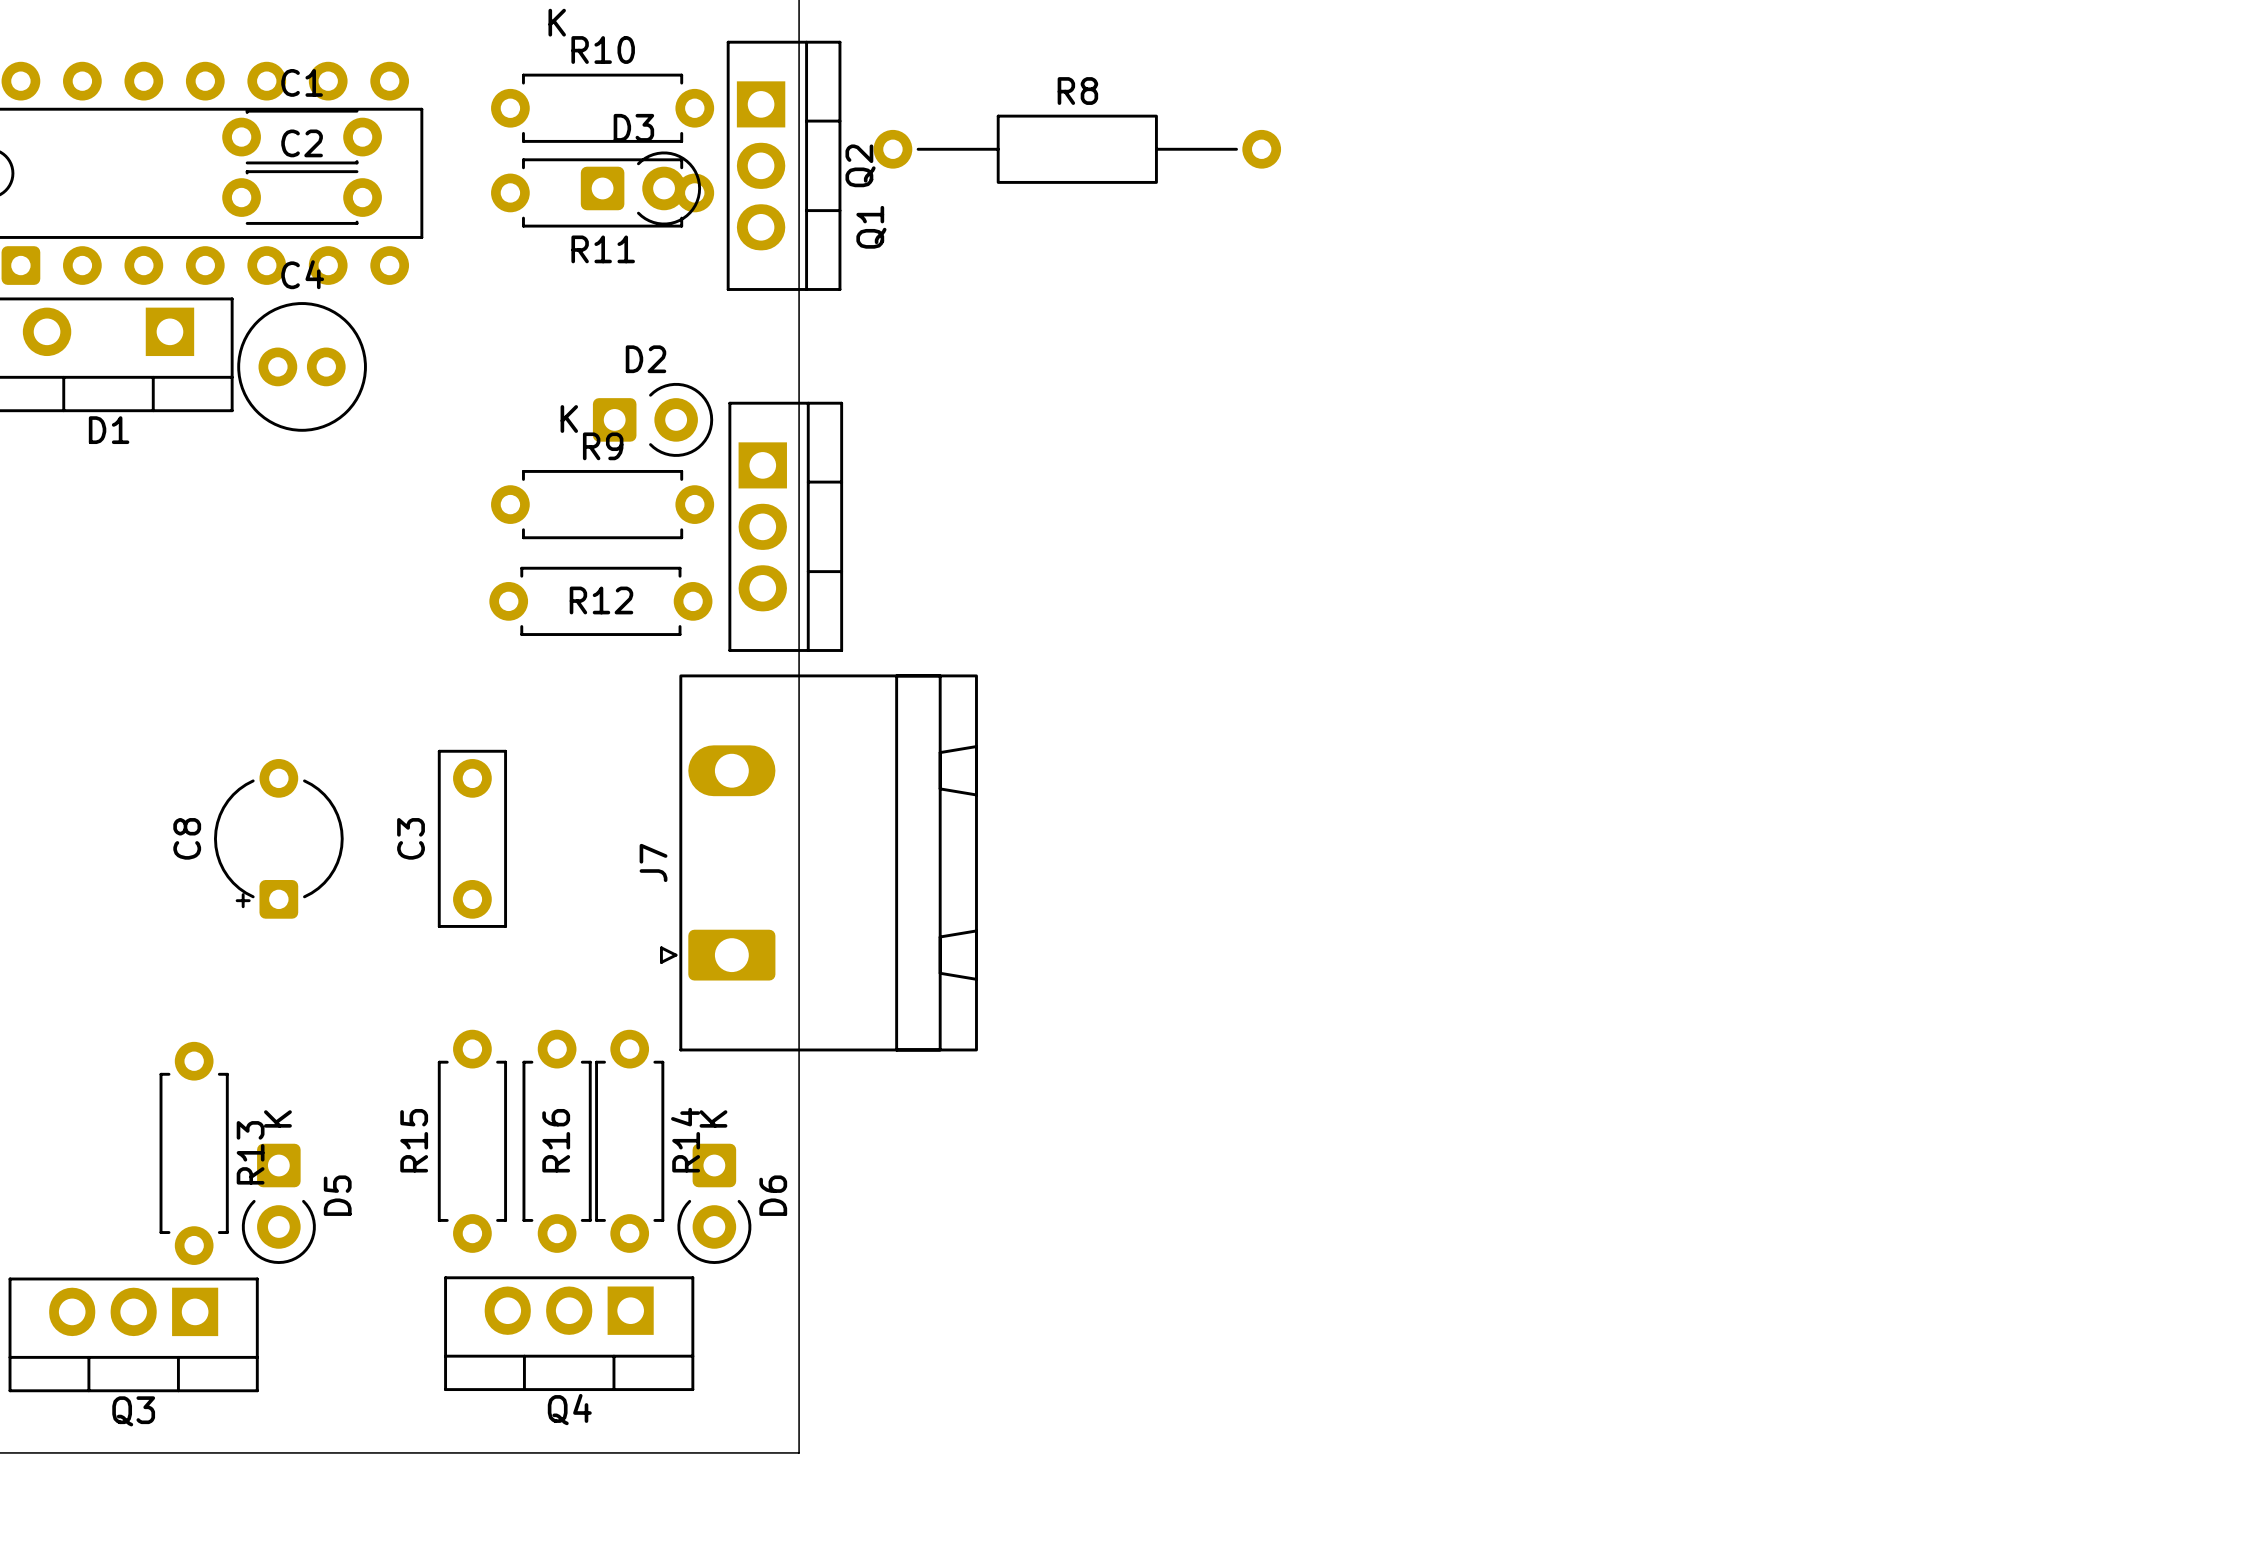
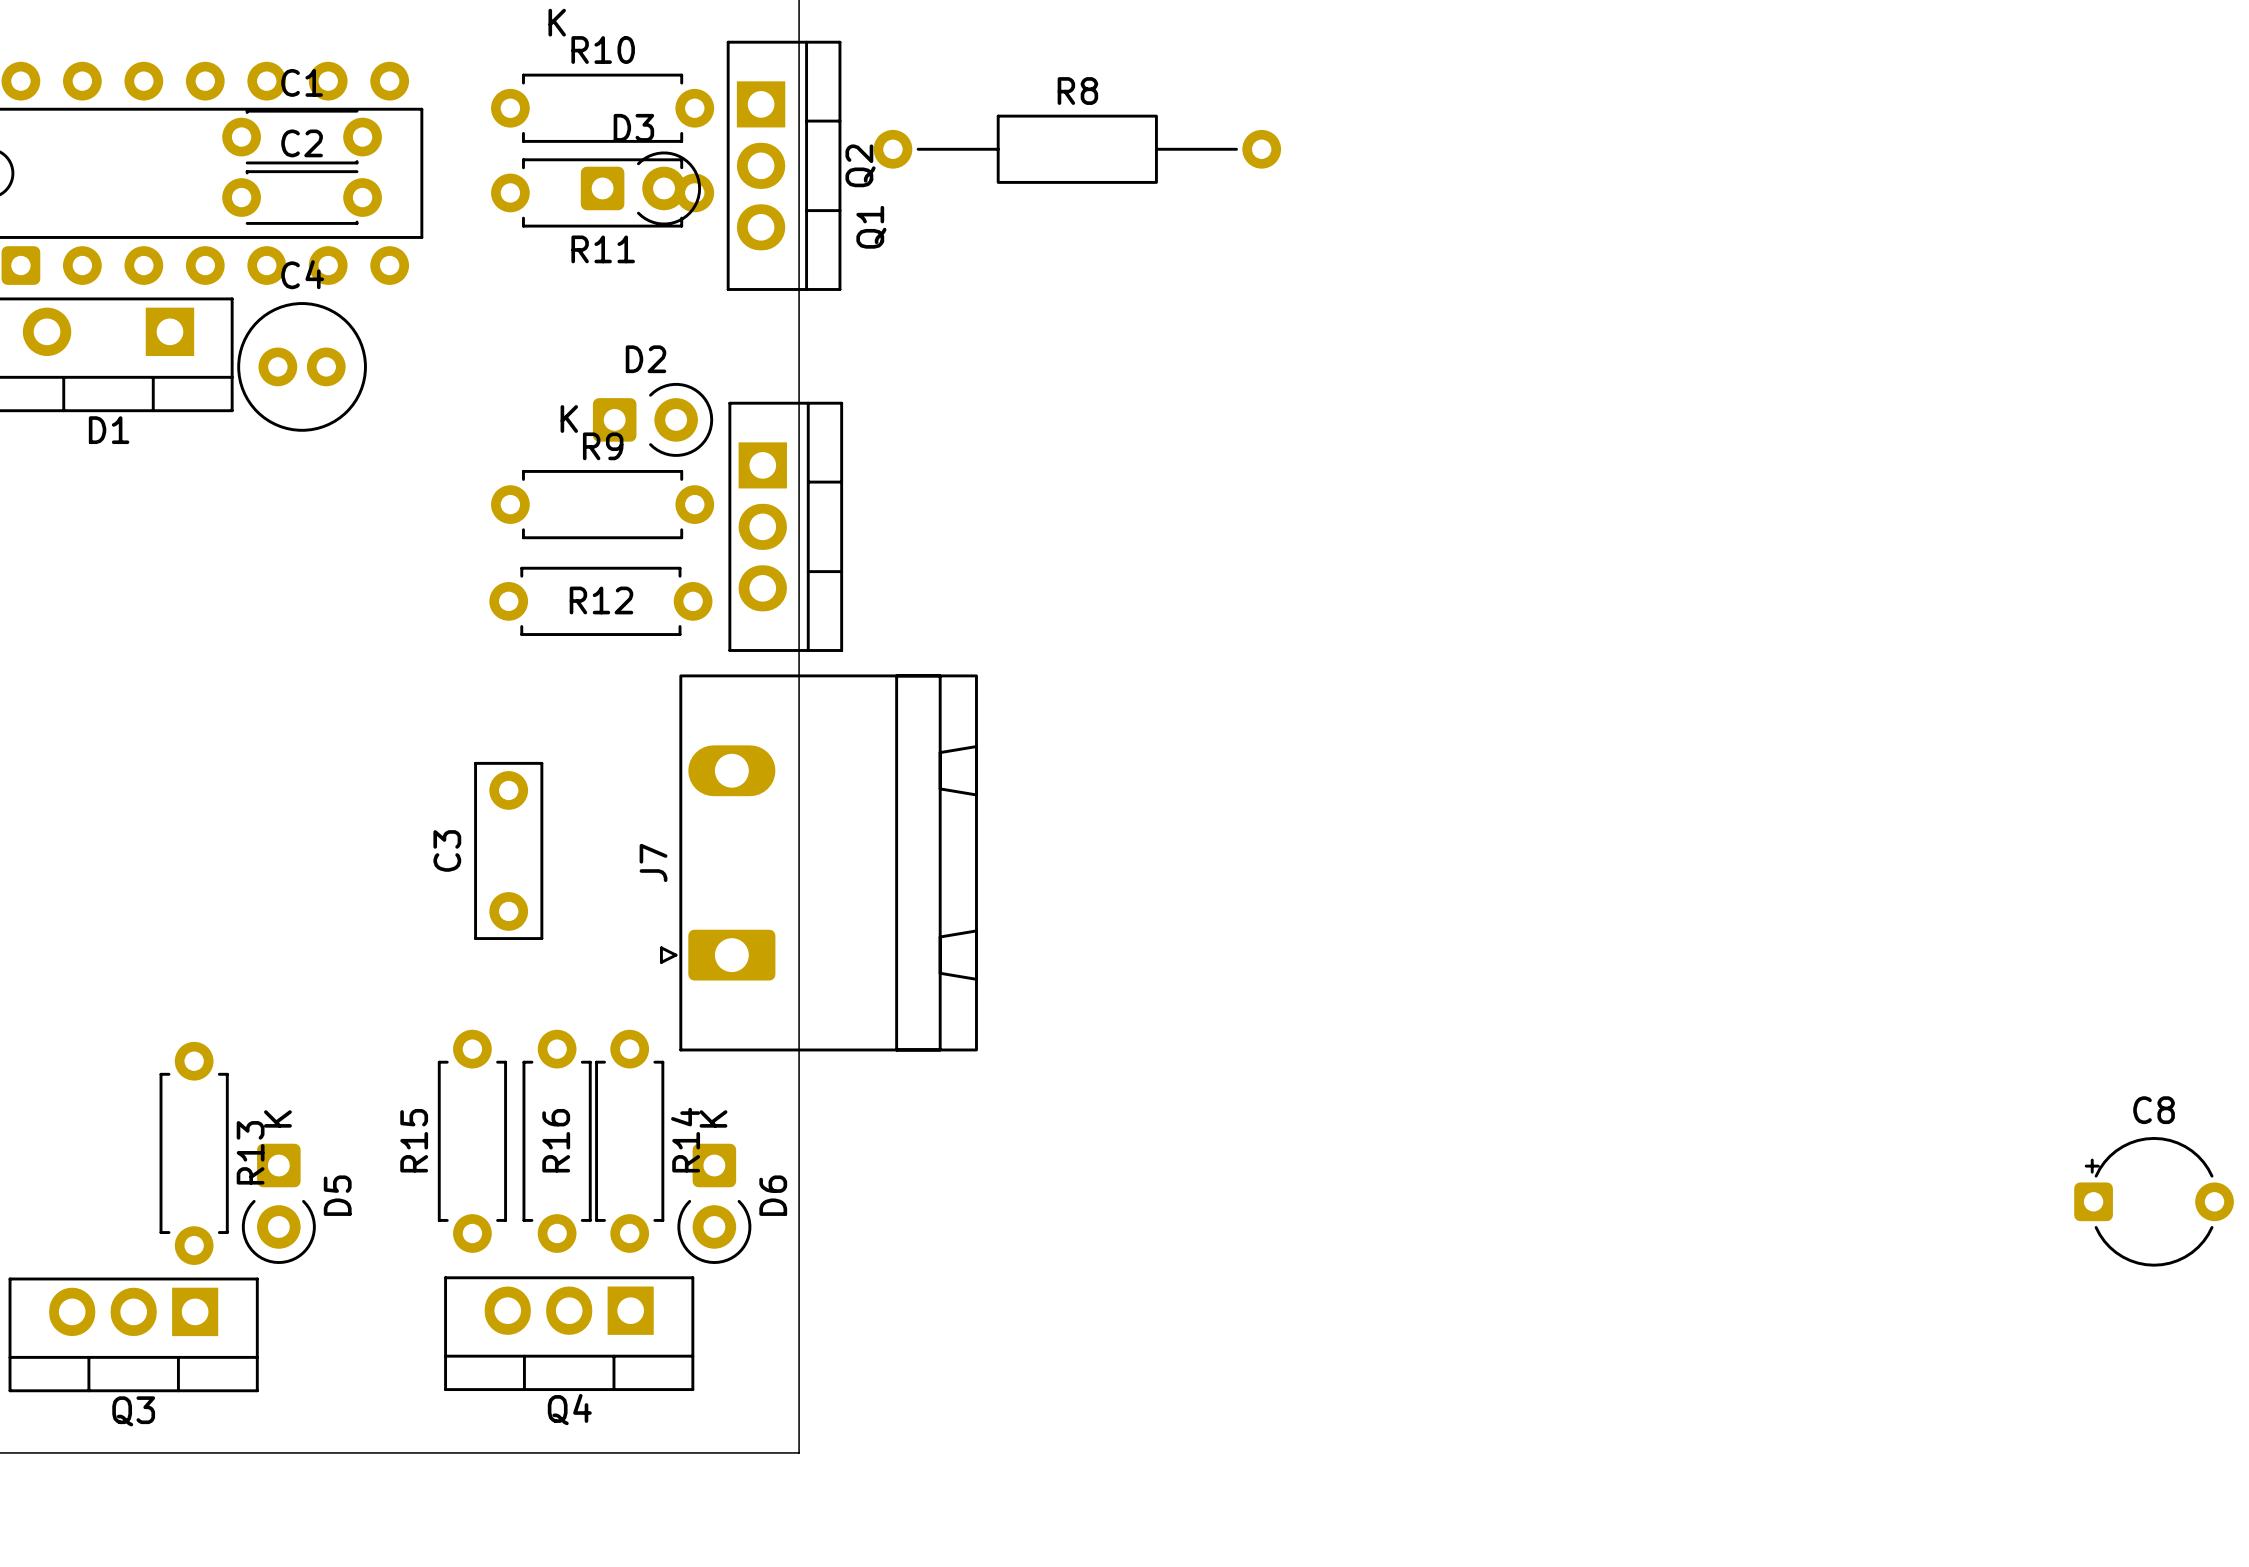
C8 rotation: 0° (278, 838) -> 90° clockwise (2154, 1201)
C8 position: (278, 838) -> (2154, 1201)
C3 position: (472, 838) -> (508, 850)

